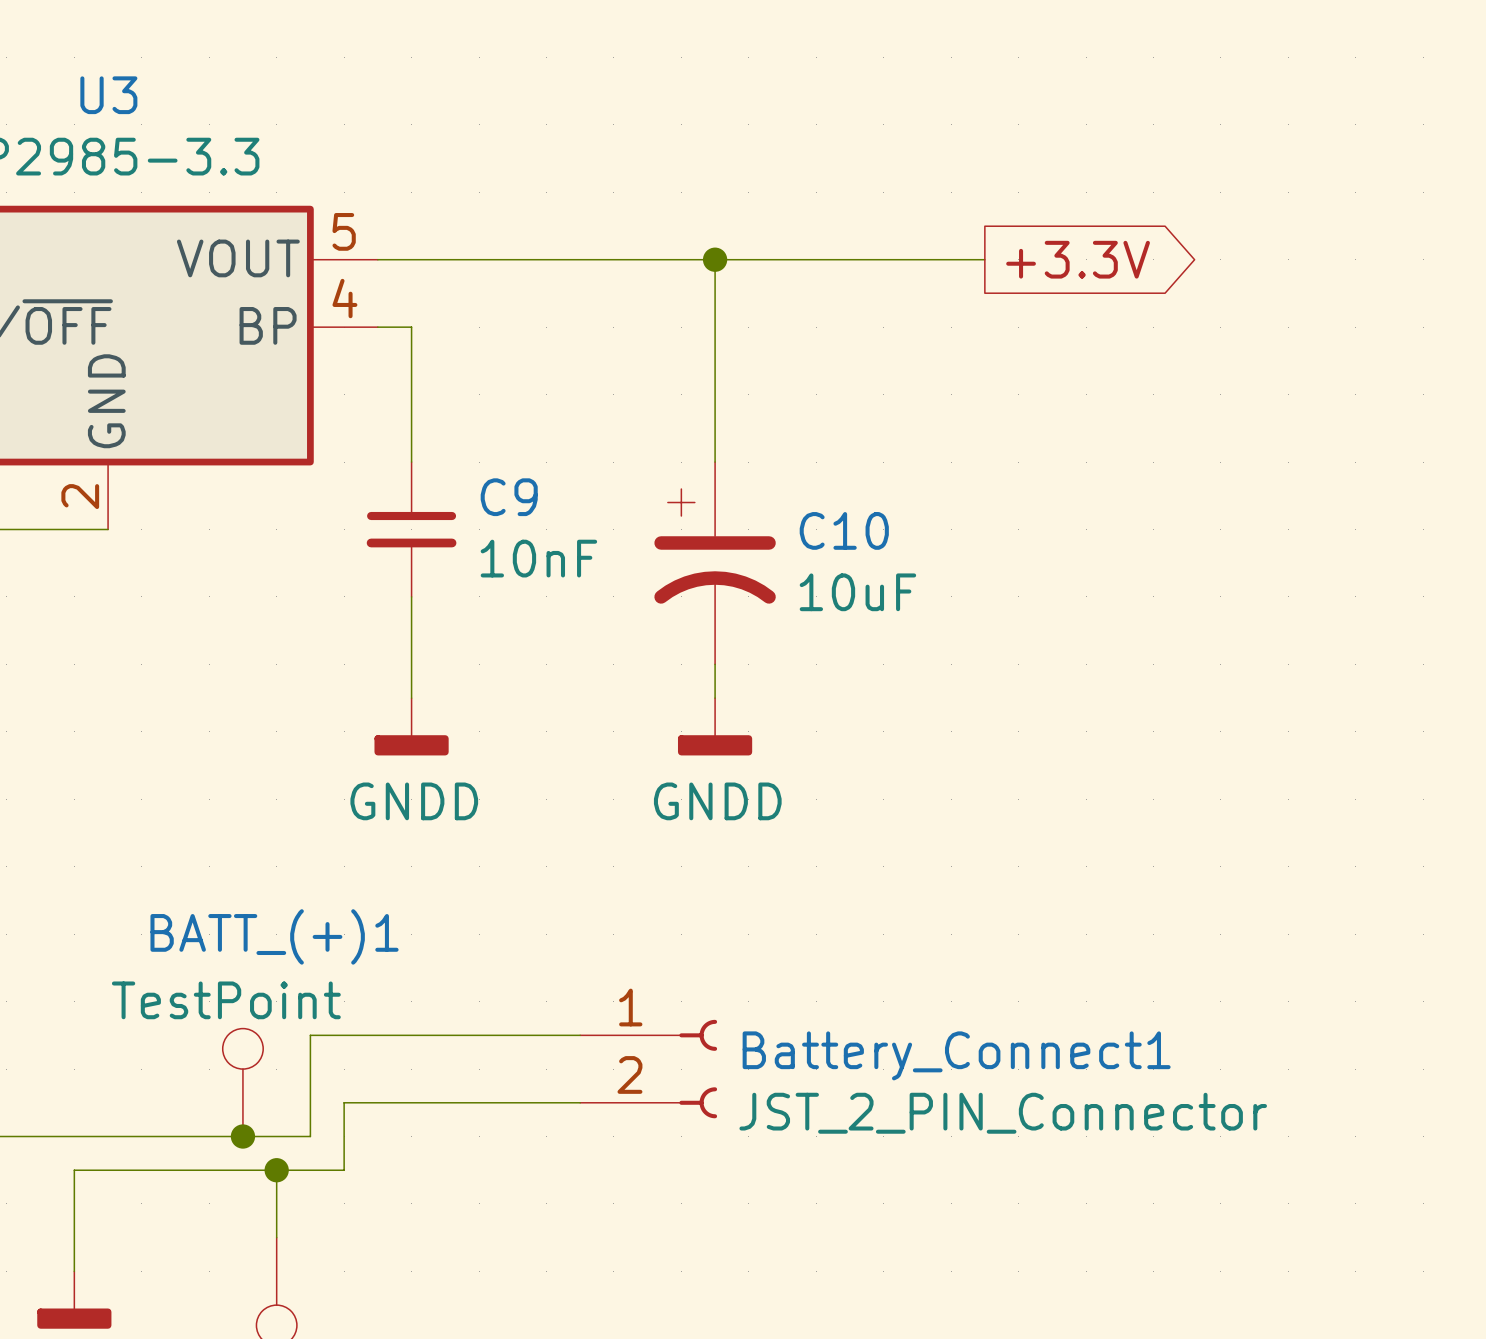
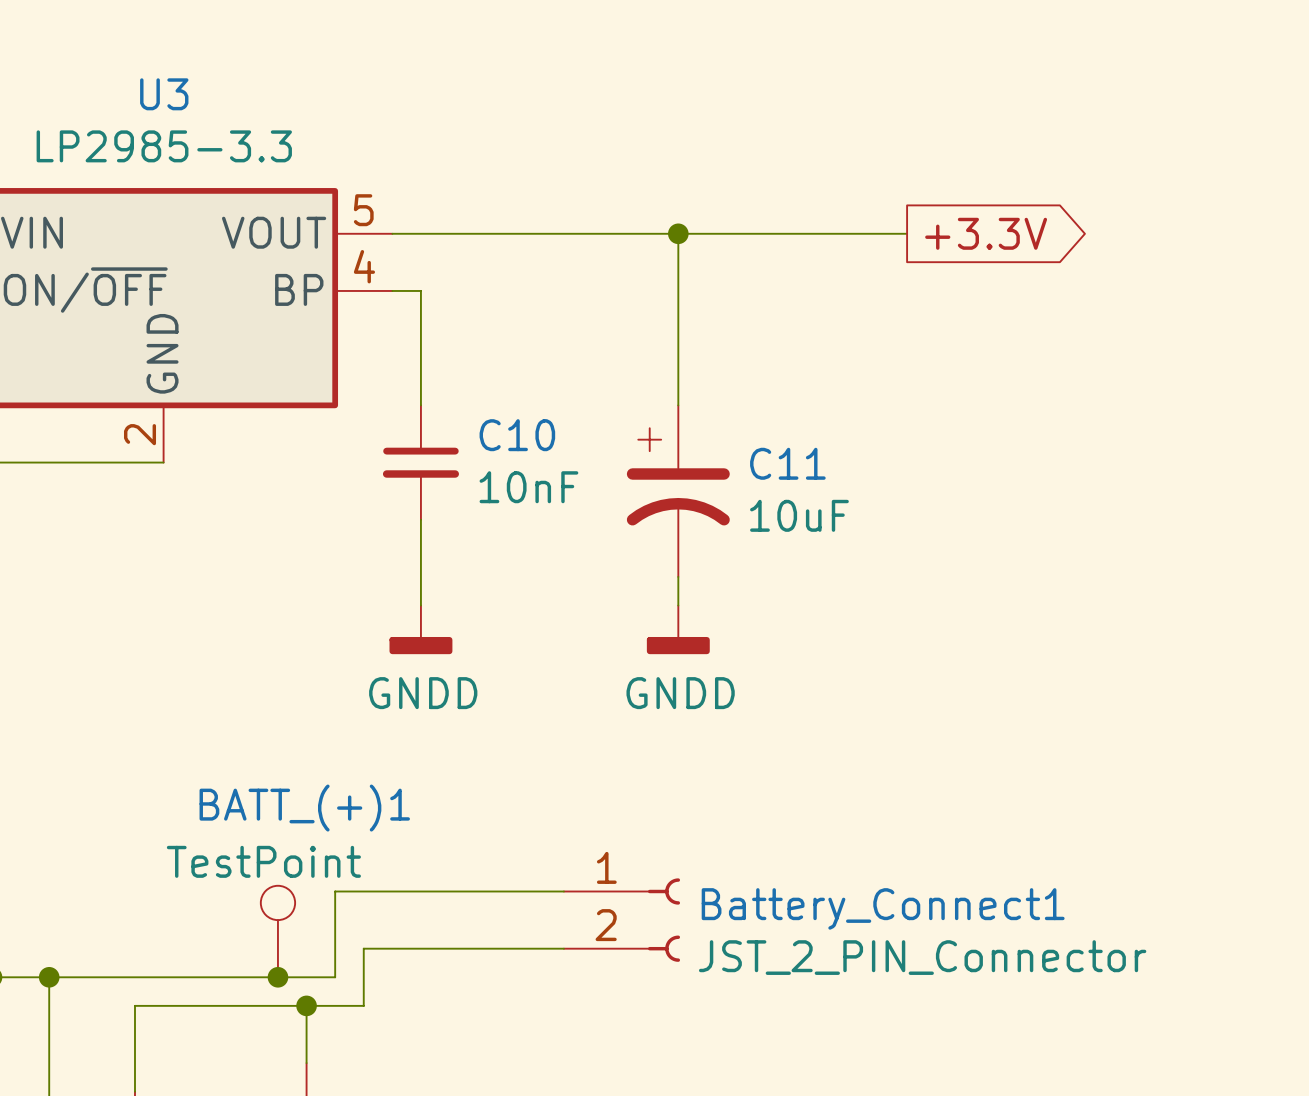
C9 name: C9 (509, 497) -> C10 (517, 435)
C10 name: C10 (844, 530) -> C11 (787, 463)

